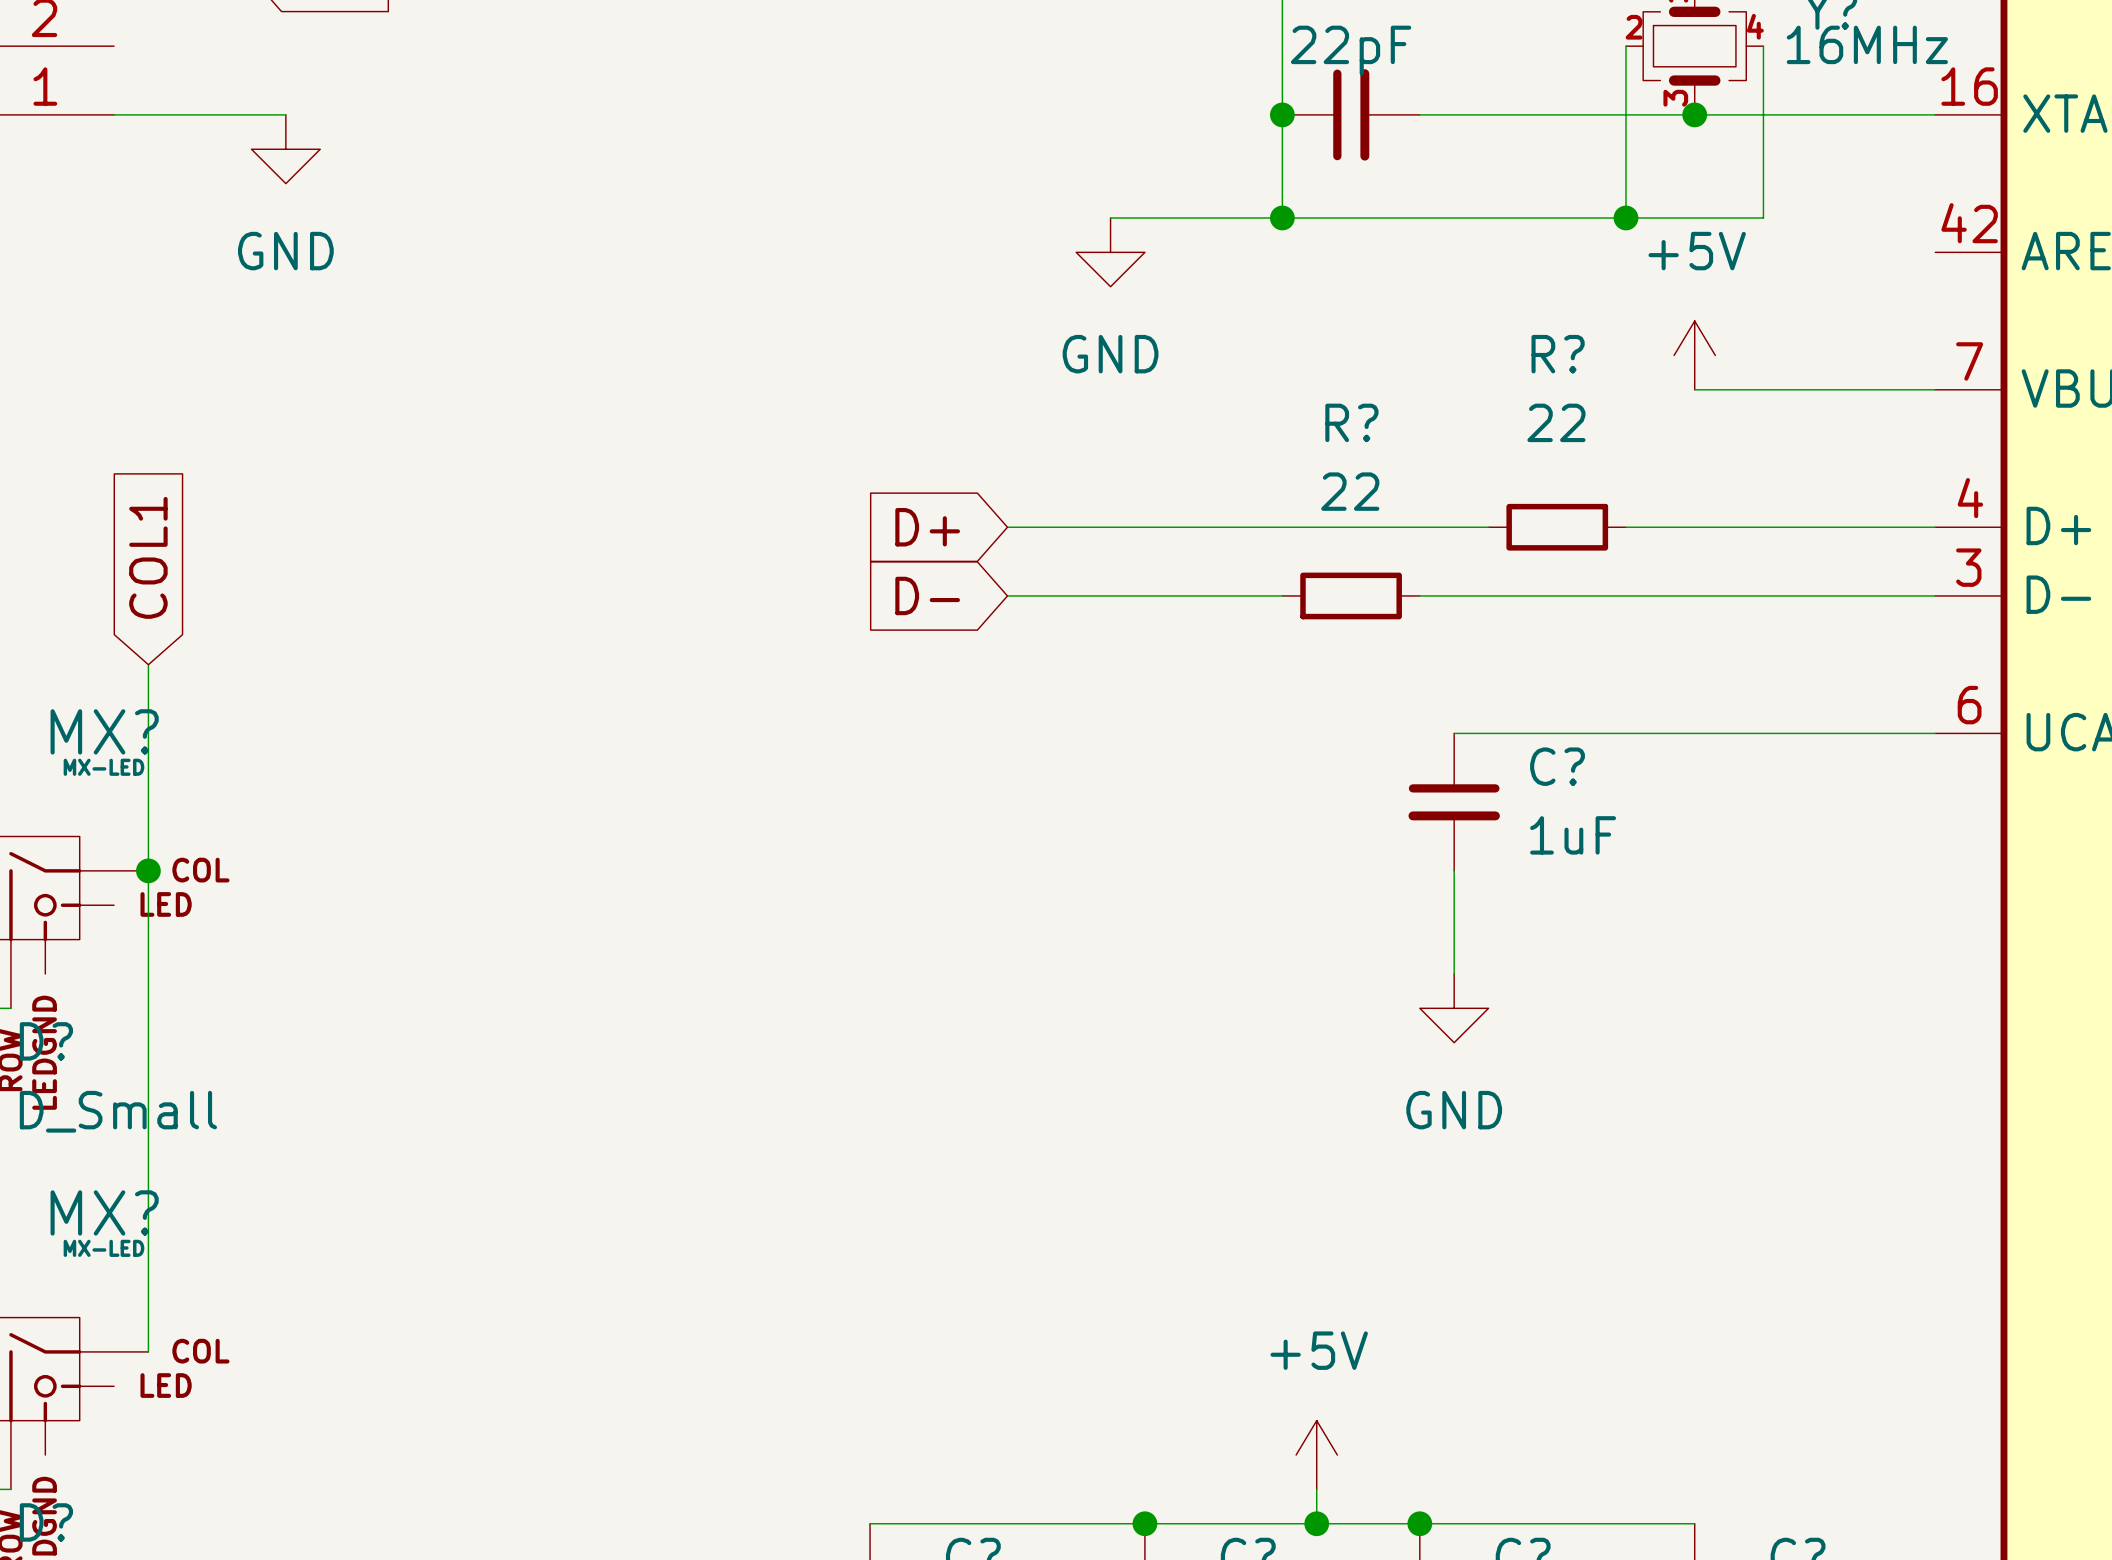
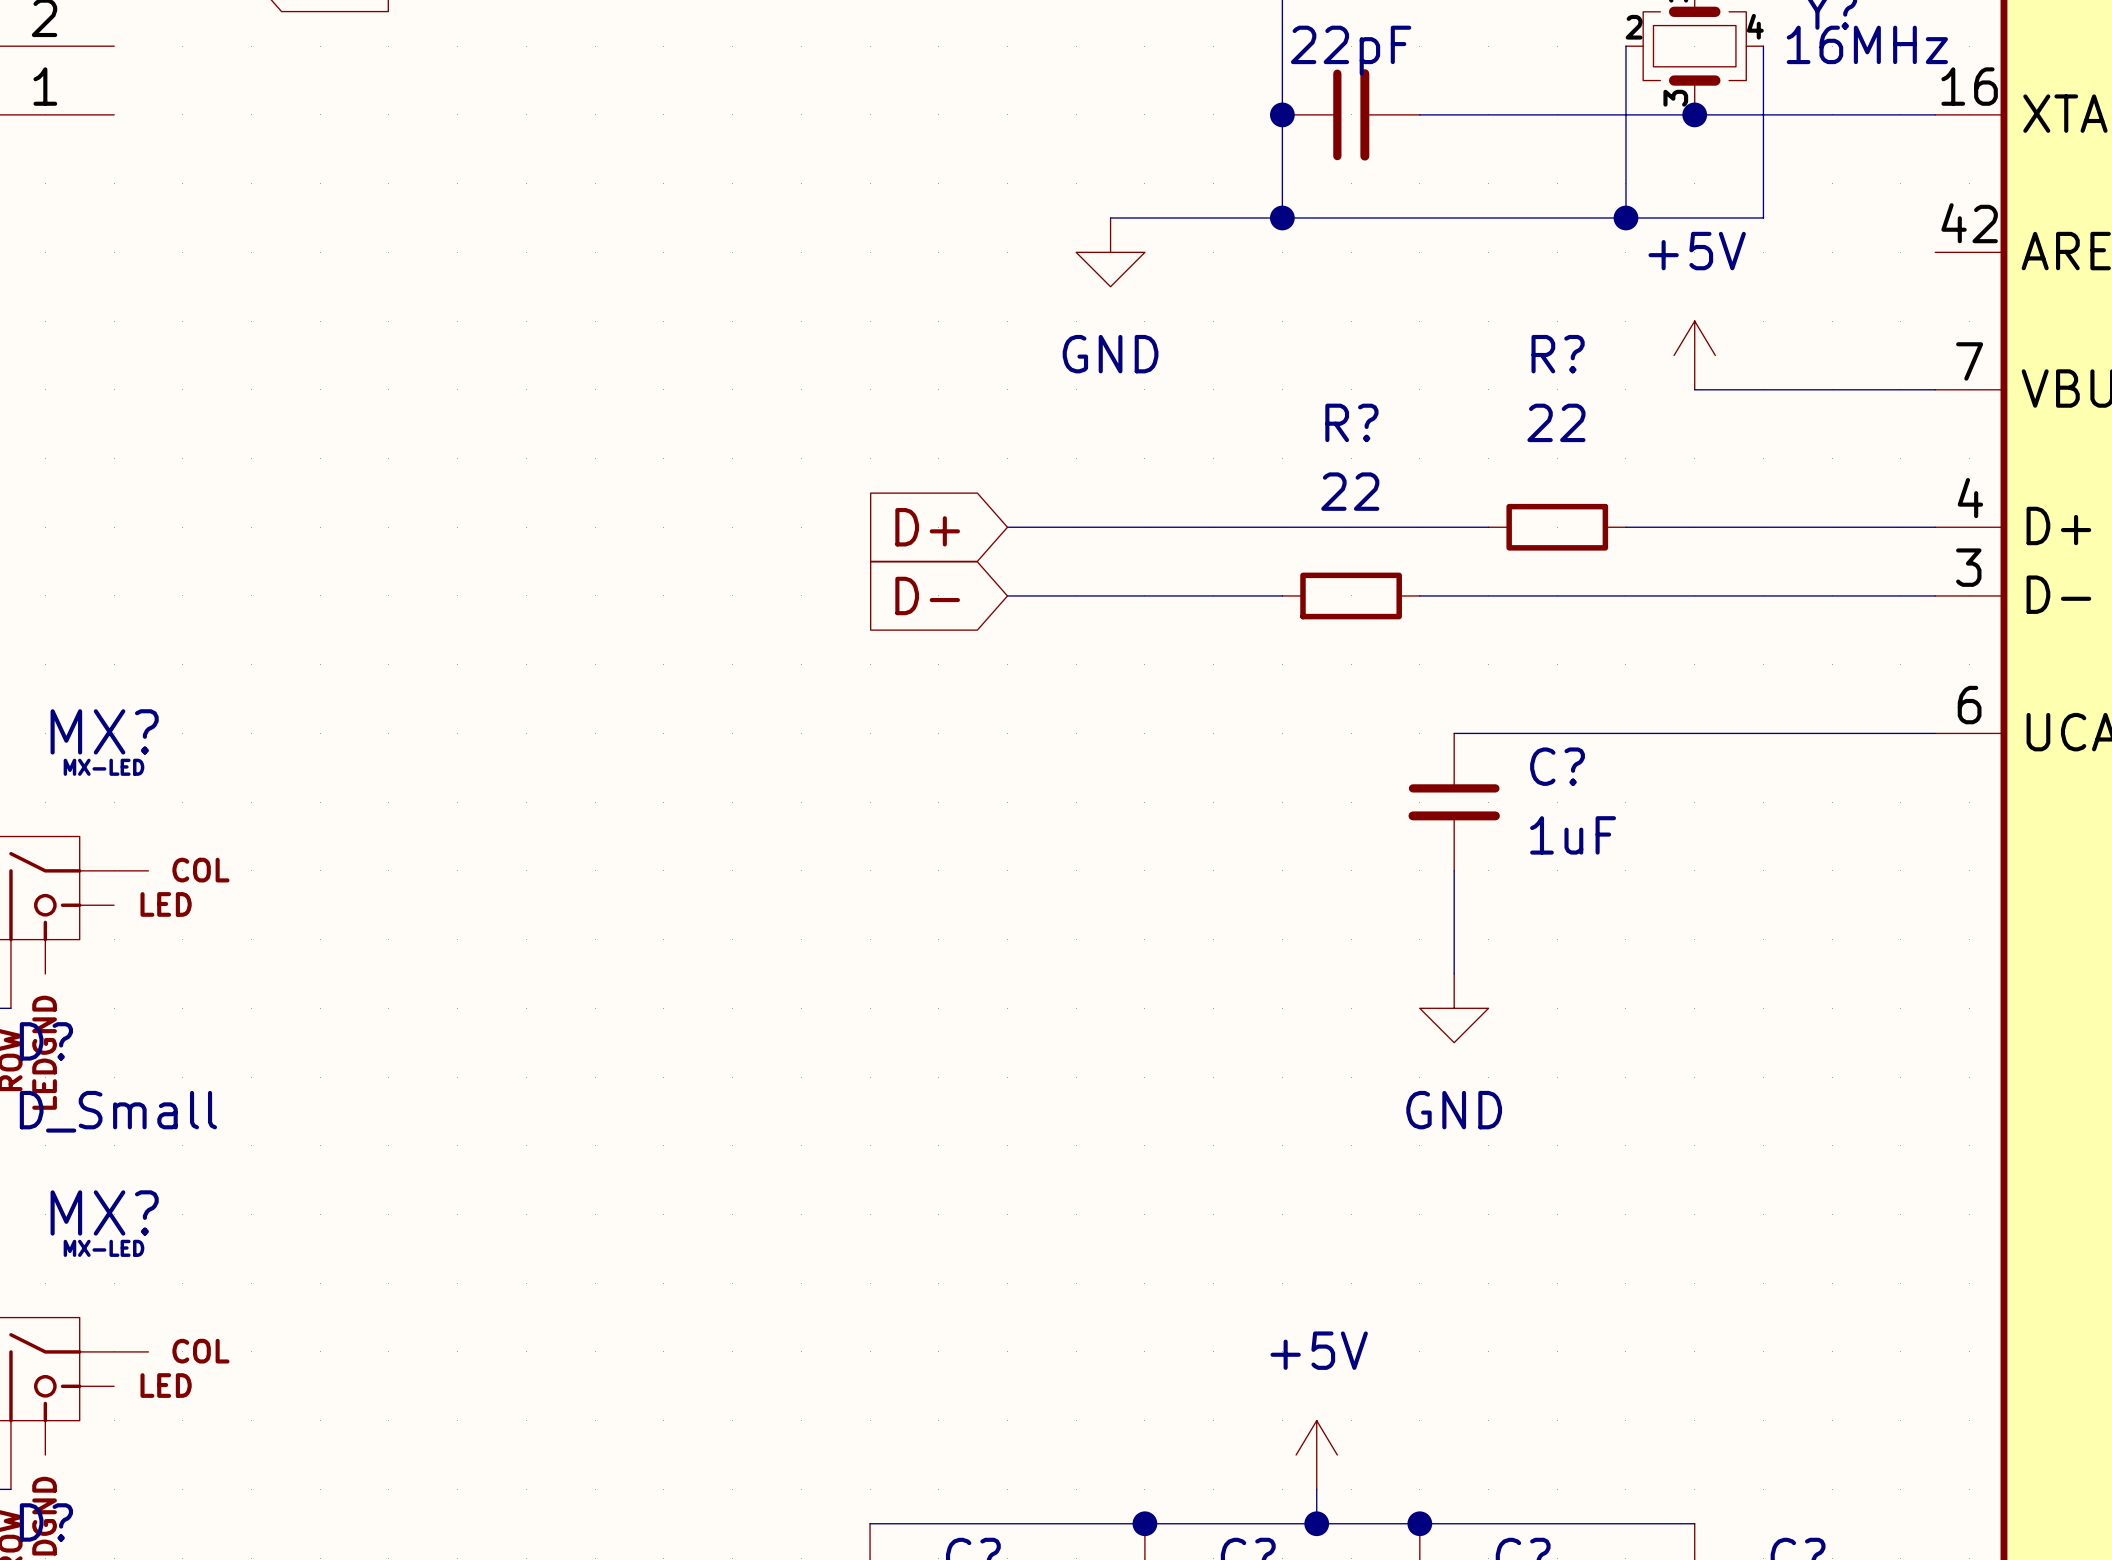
wire: (114, 114) (285, 114) -> none
power symbol: GND (285, 149) -> none
global label: COL1 (148, 557) -> none
wire: (148, 664) (148, 1351) -> none
junction: (148, 870) -> none

